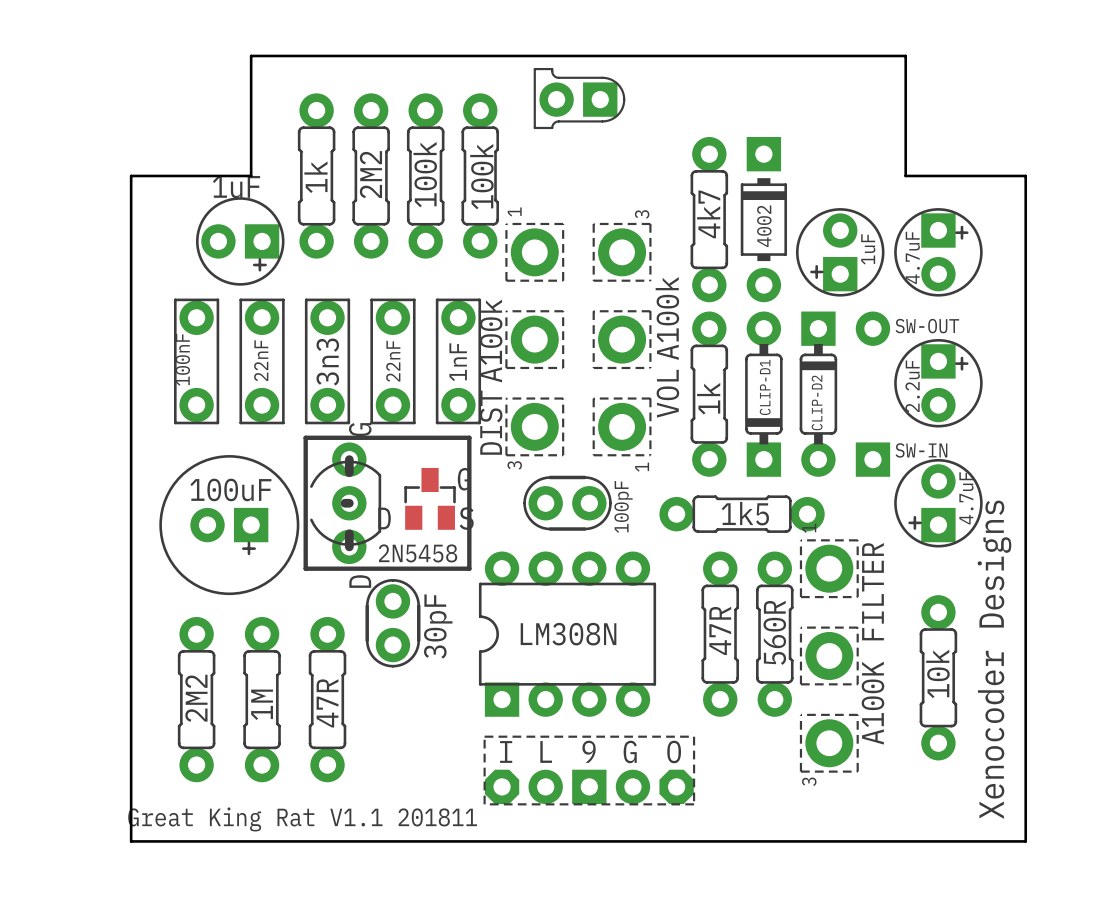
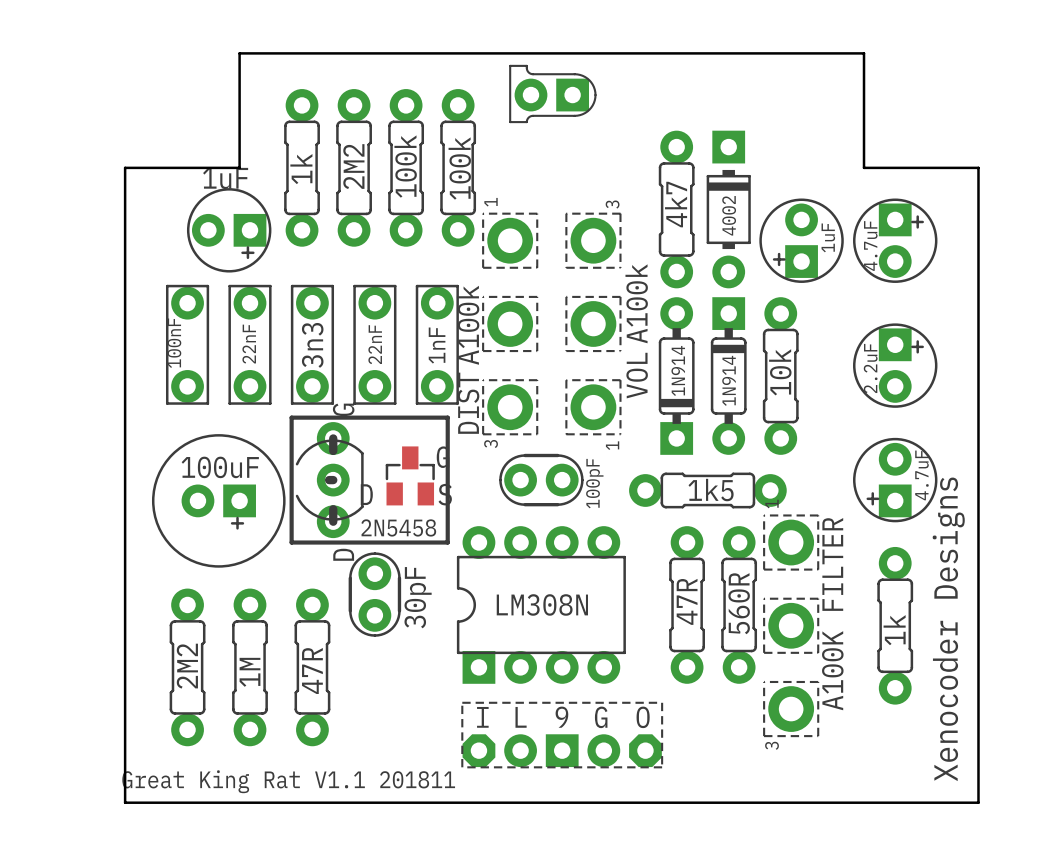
part footprint: [690, 311, 729, 477] -> [658, 297, 695, 455]
part footprint: [799, 311, 838, 477] -> [762, 297, 799, 455]
SW-OUT: (872, 328) -> none
part value: CLIP-D1 (765, 387) -> 1N914 (729, 380)
part rotation: 0° (763, 394) -> 180° (728, 376)
part value: 1k (708, 398) -> 1N914 (678, 370)
part value: CLIP-D2 (817, 402) -> 10k (780, 372)
SW-IN: (872, 459) -> none
part: none -> 1k (895, 625)
part: 10k (938, 677) -> none

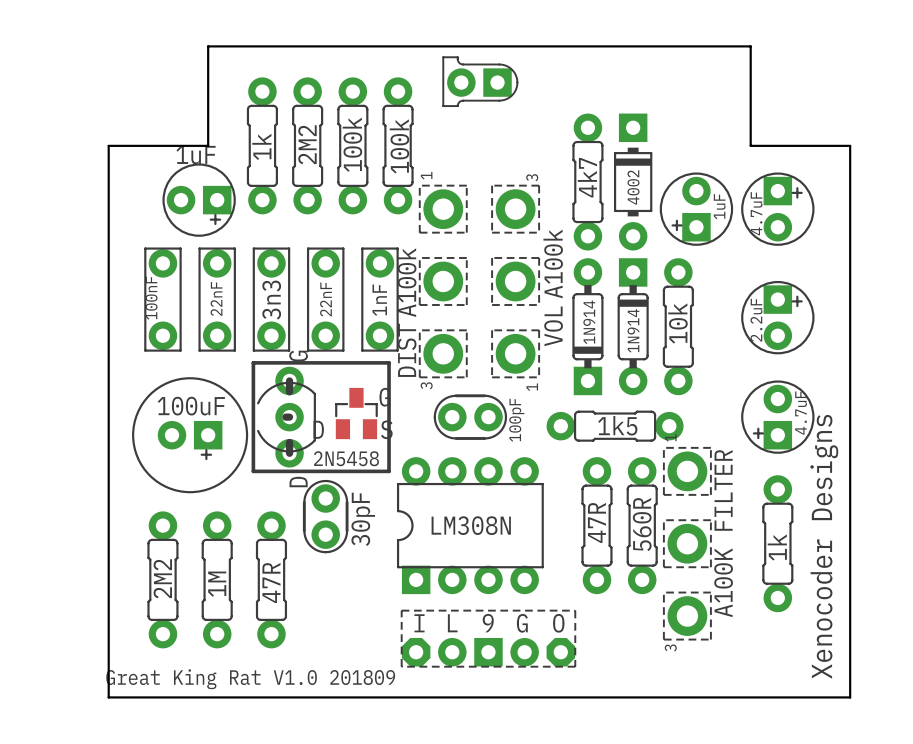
text: Great King Rat V1.1 201811 (288, 781) -> Great King Rat V1.0 201809 (250, 679)

